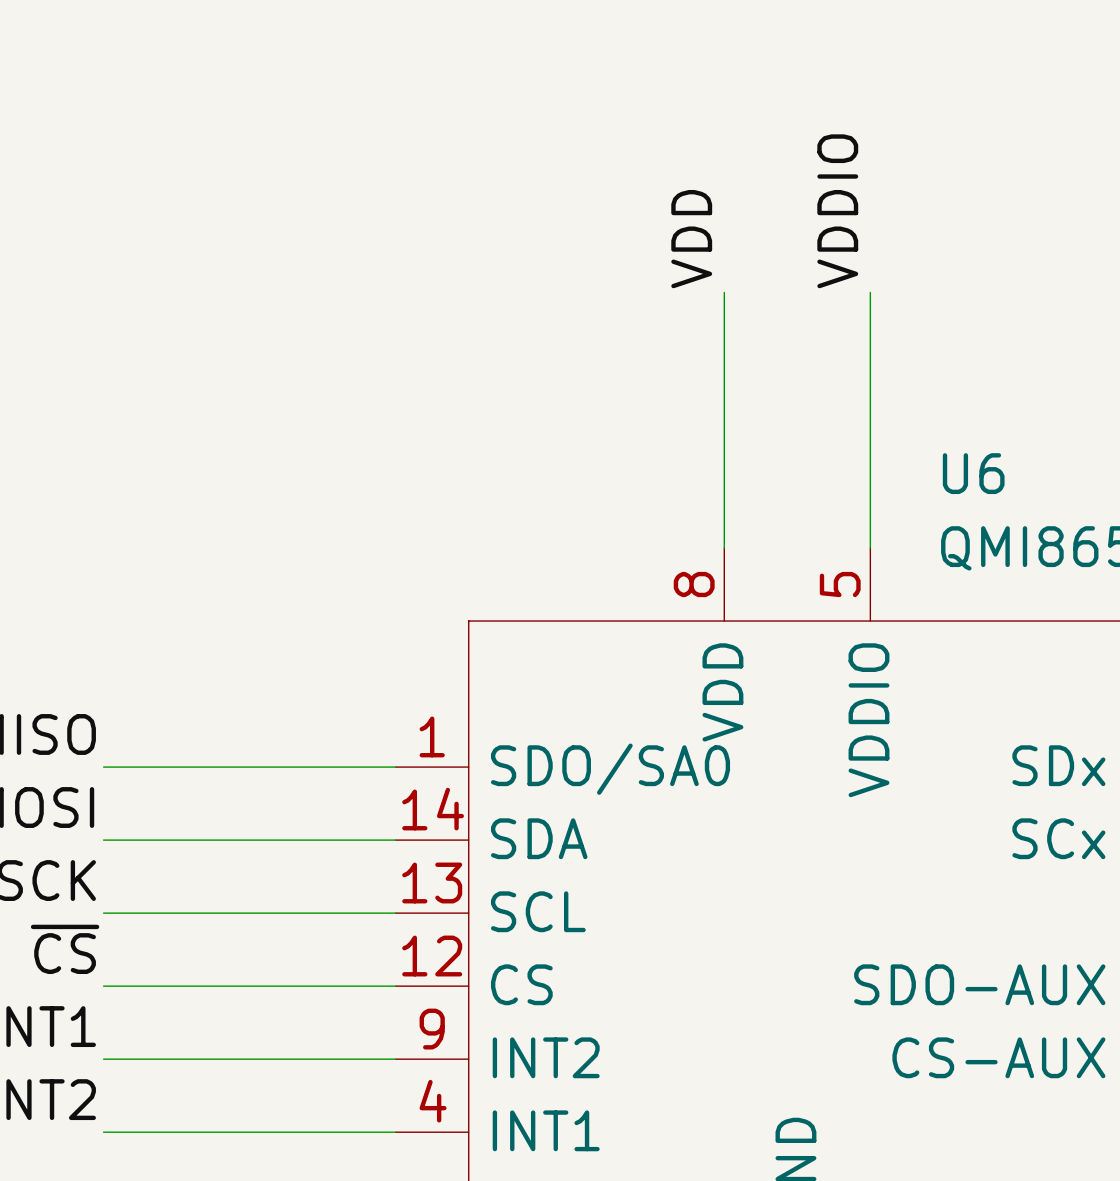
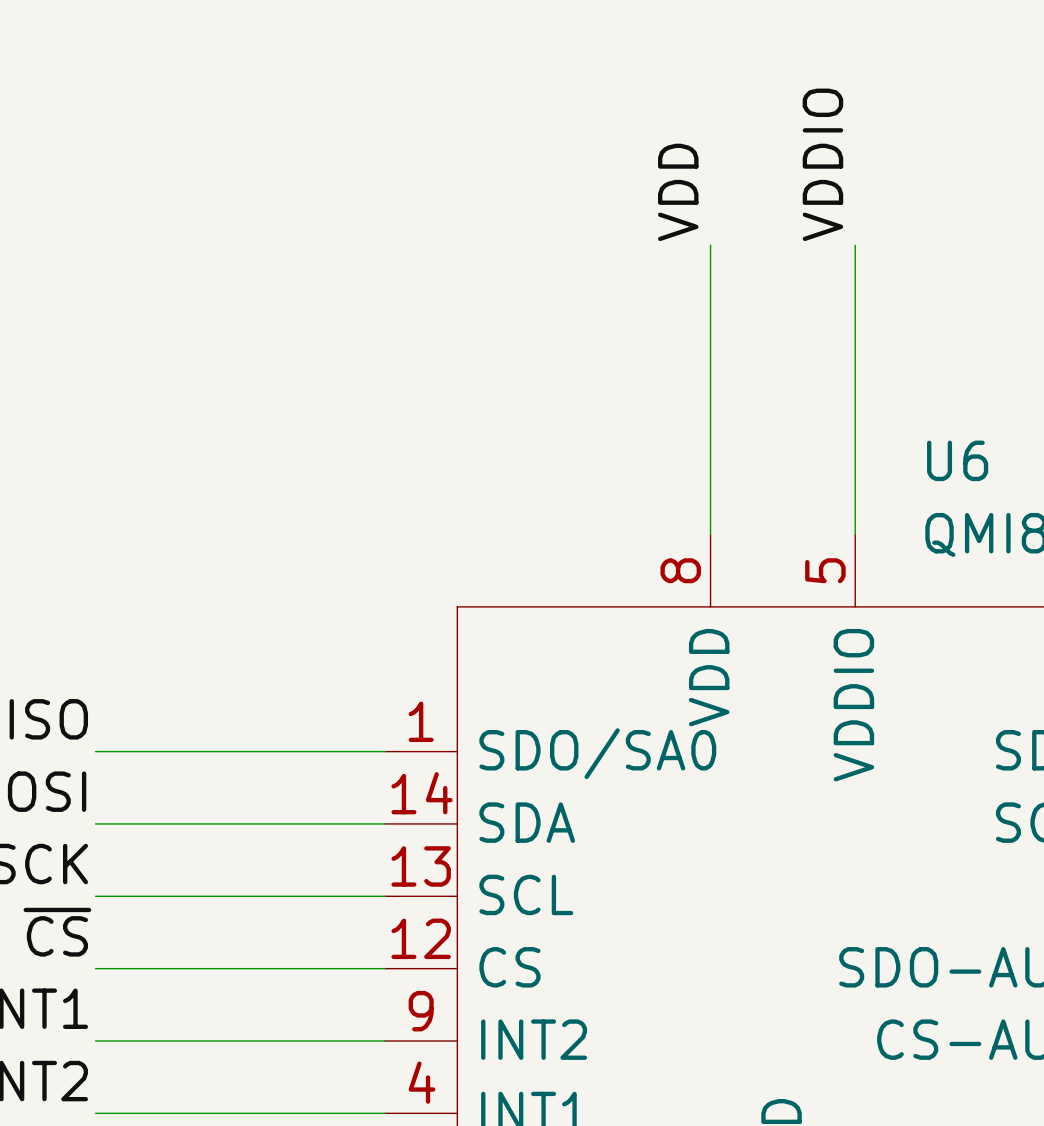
label position: VDDIO (837, 211) -> VDDIO (822, 164)
label position: VDD (691, 239) -> VDD (678, 192)
wire: none -> (710, 245) (710, 281)
wire: none -> (855, 245) (855, 281)

